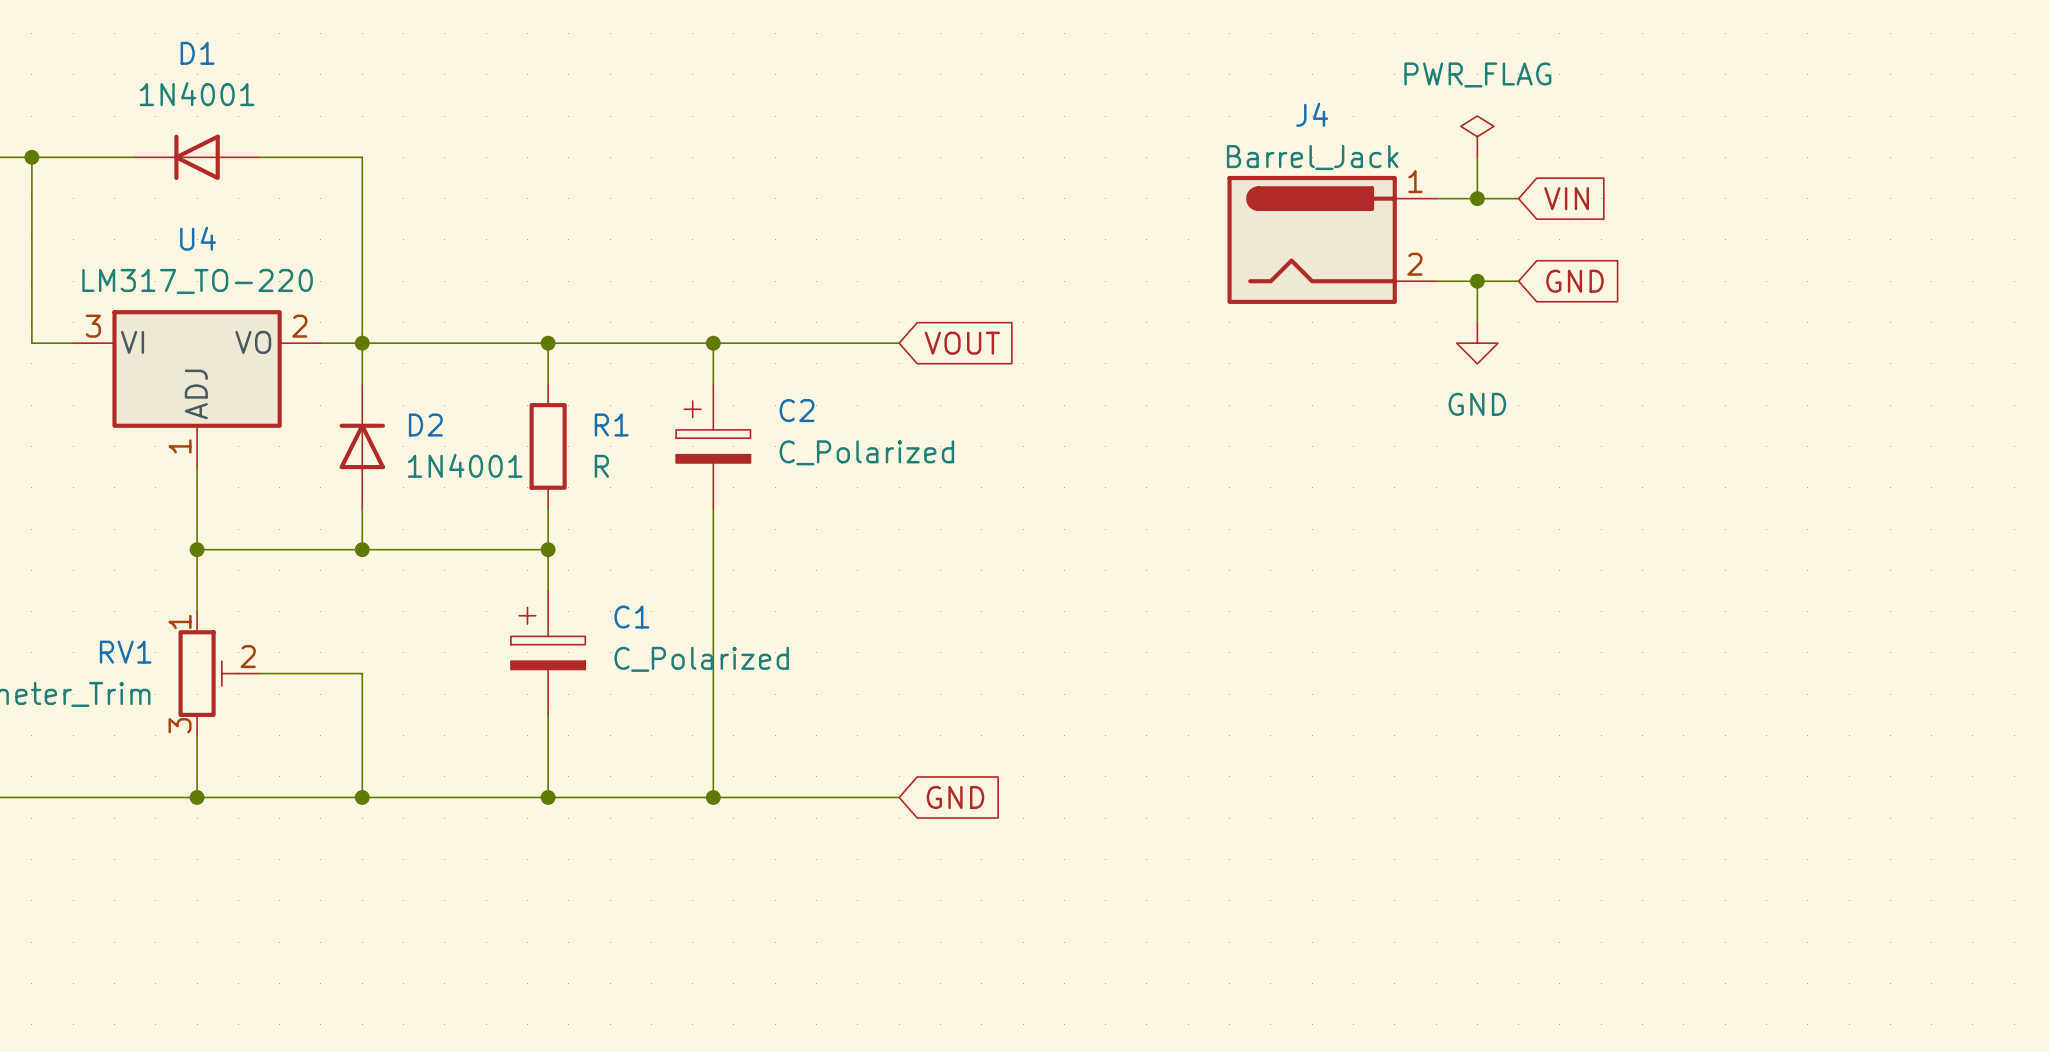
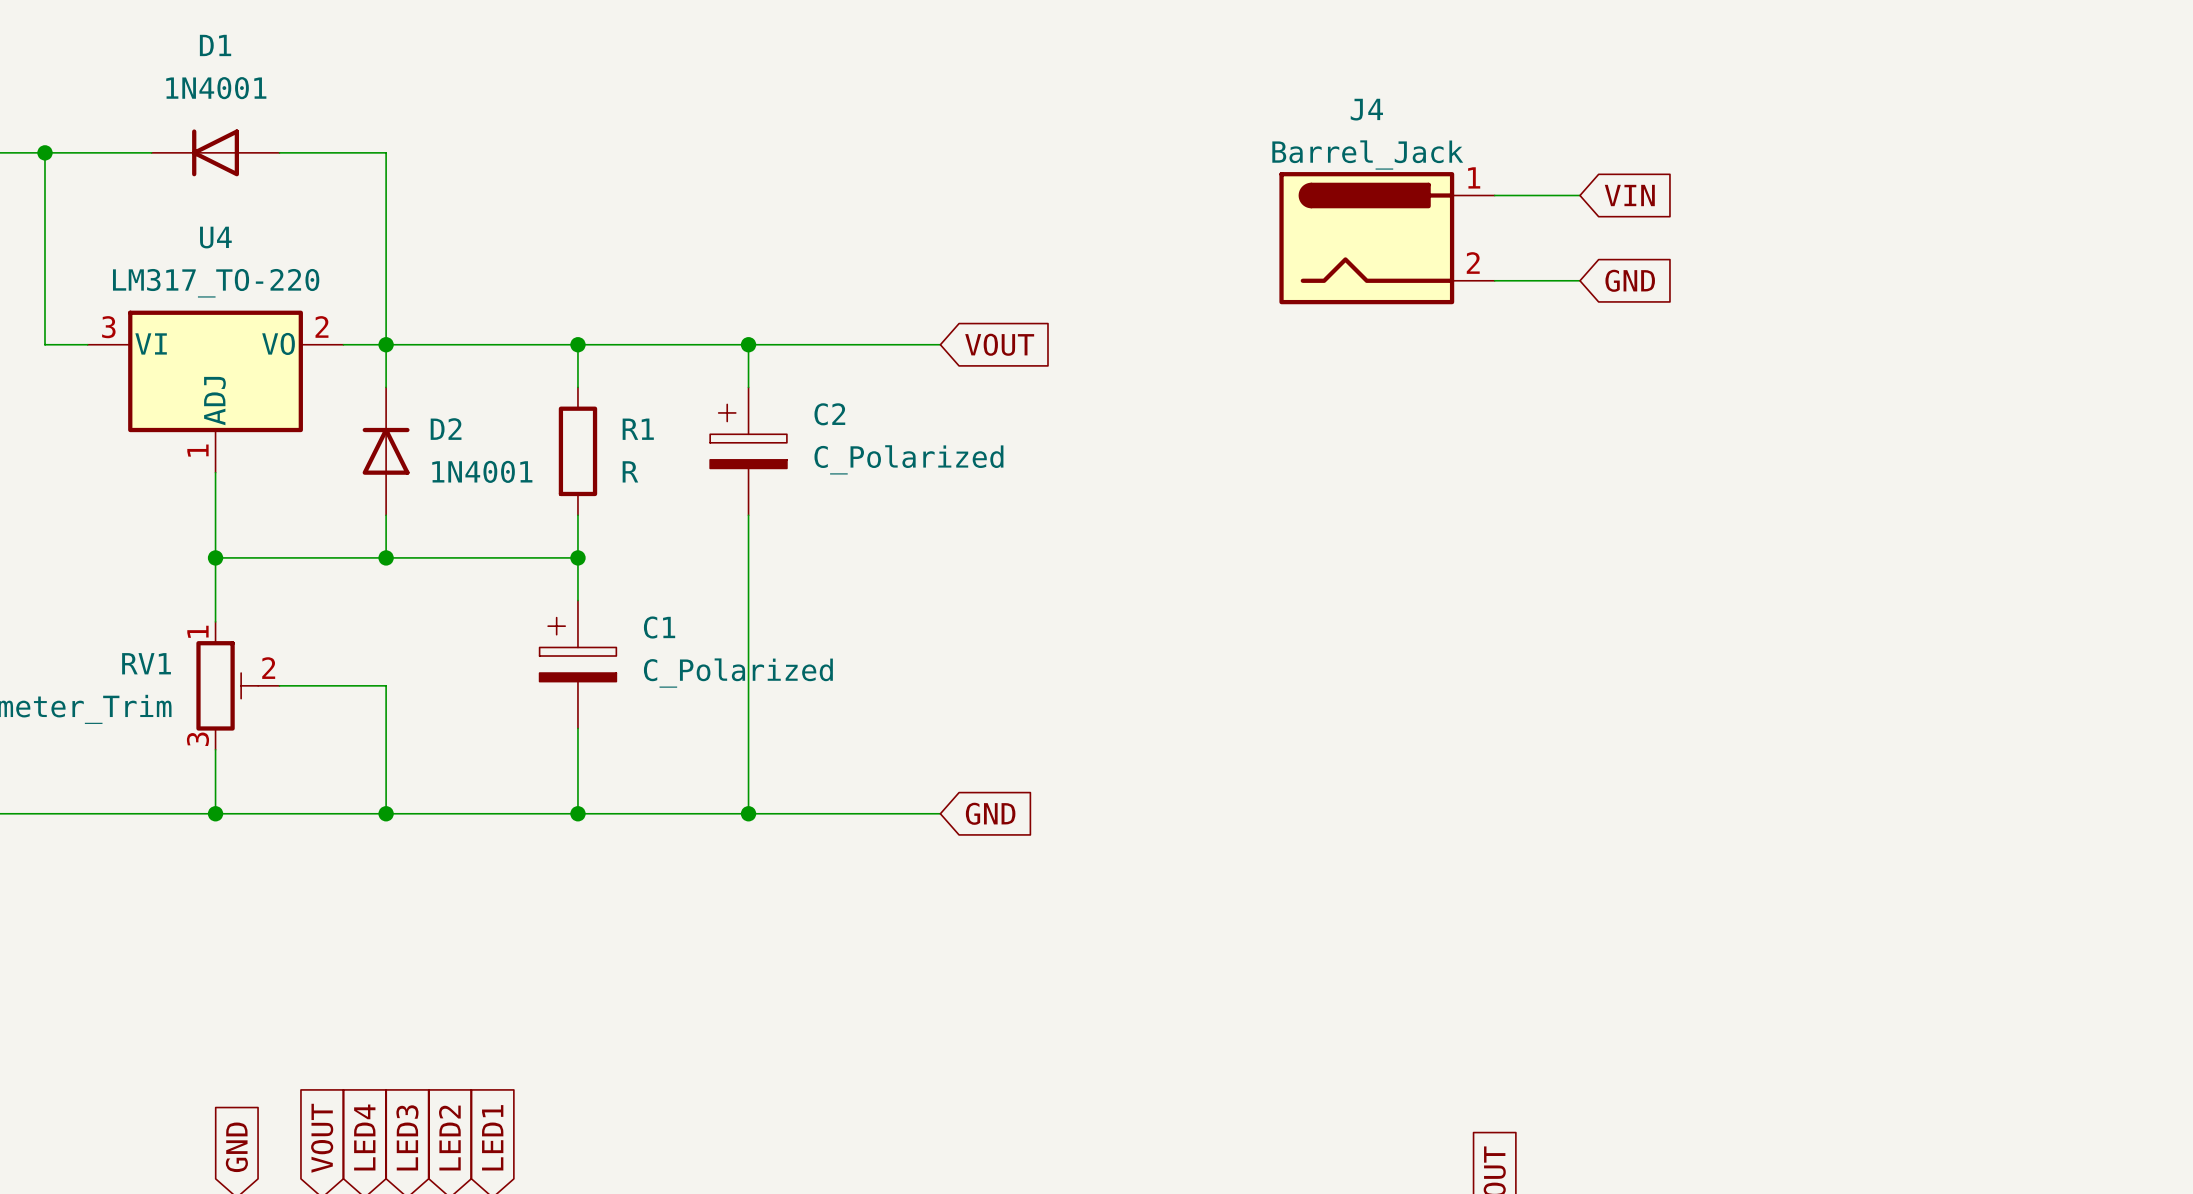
power symbol: PWR_FLAG (1477, 136) -> none
wire: (1477, 157) (1477, 198) -> none
junction: (1477, 198) -> none
wire: (1477, 281) (1477, 322) -> none
junction: (1477, 281) -> none
power symbol: GND (1477, 343) -> none

